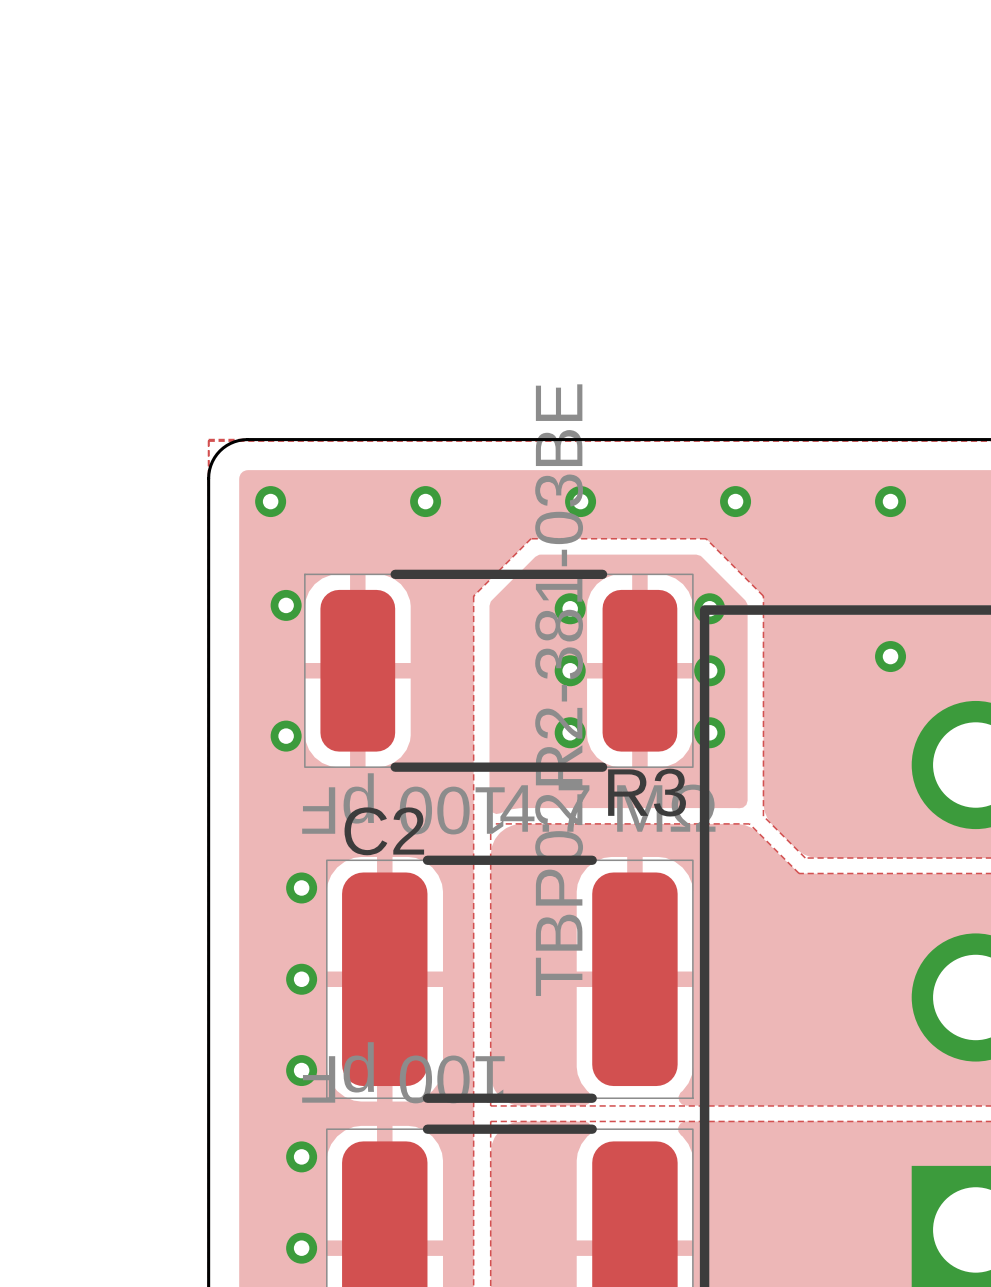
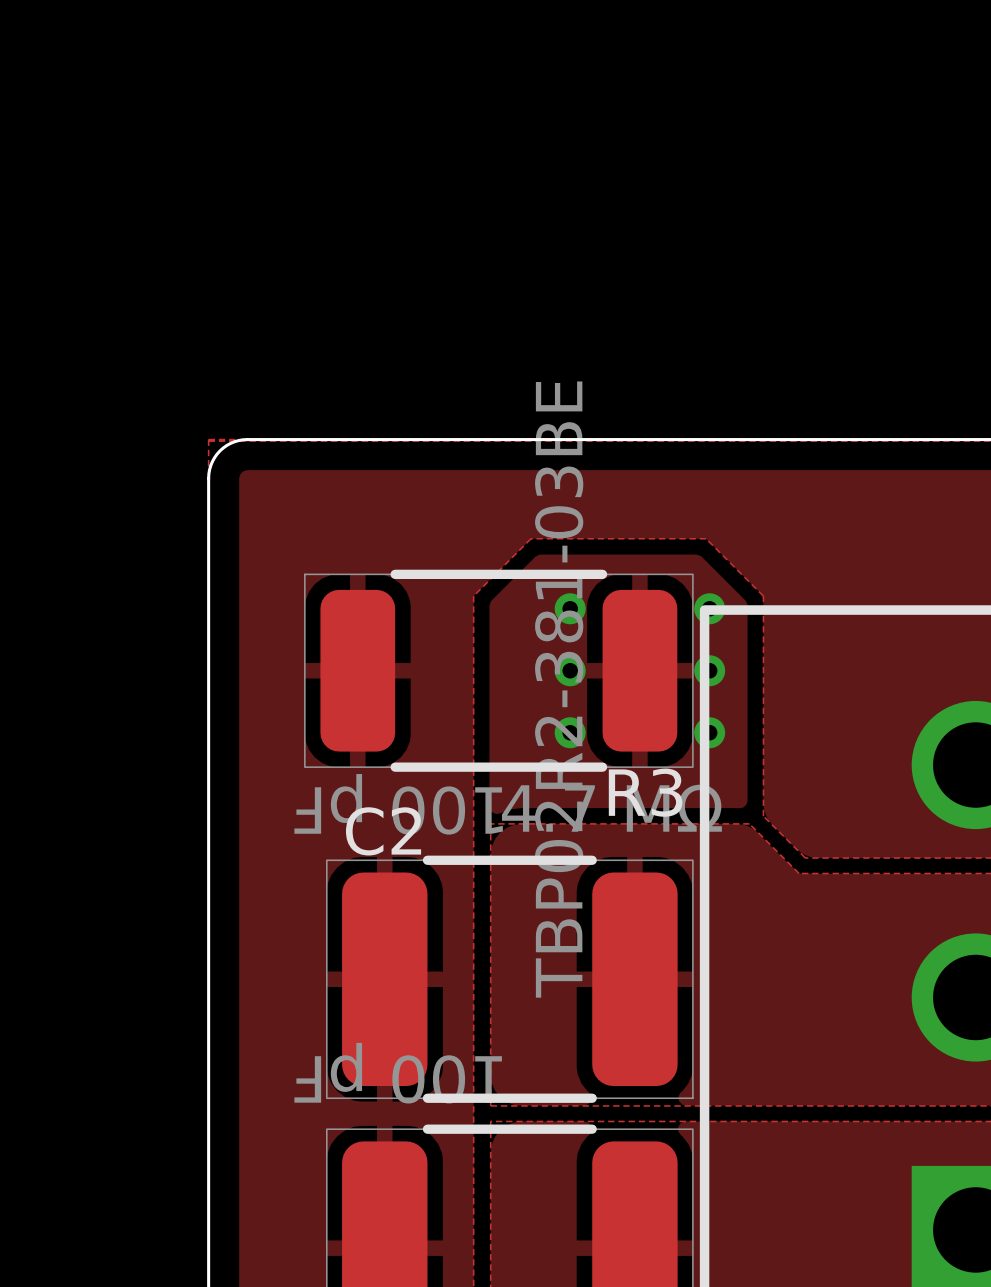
via: (270, 501) -> none
via: (425, 501) -> none
via: (580, 501) -> none
via: (735, 501) -> none
via: (890, 501) -> none
via: (286, 605) -> none
via: (890, 656) -> none
via: (286, 736) -> none
via: (301, 887) -> none
via: (301, 979) -> none
via: (301, 1070) -> none
via: (301, 1156) -> none
via: (301, 1248) -> none

